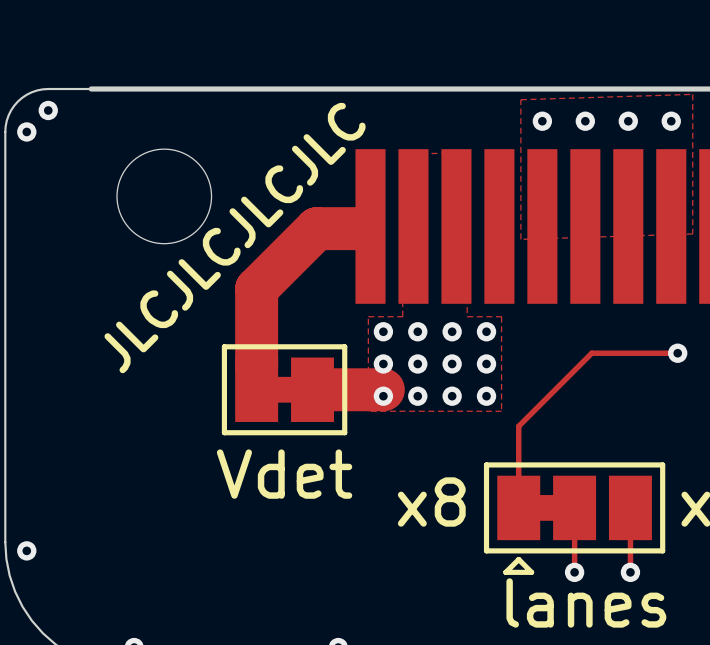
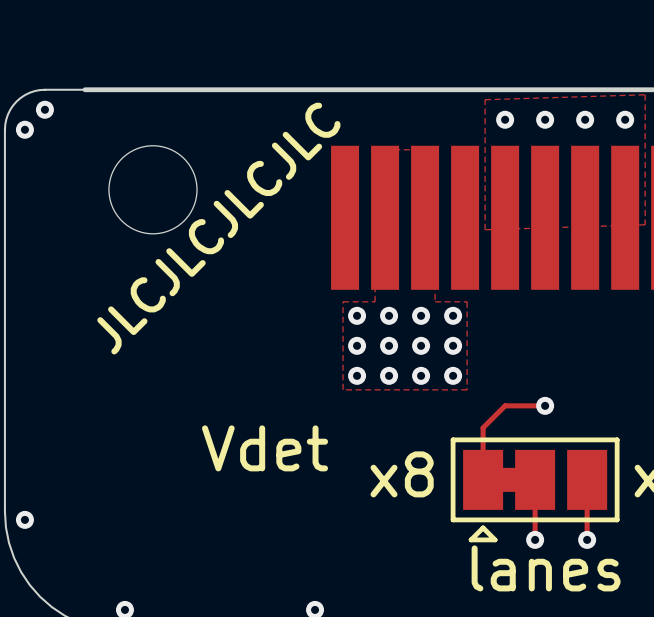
track: (359, 228) (316, 228) (256, 288) (256, 368) -> none
track: (677, 353) (591, 353) (518, 426) (518, 452) -> (545, 405) (505, 405) (483, 427)
via position: (677, 353) -> (545, 405)
part: (284, 389) -> none
track: (312, 389) (383, 389) -> none

